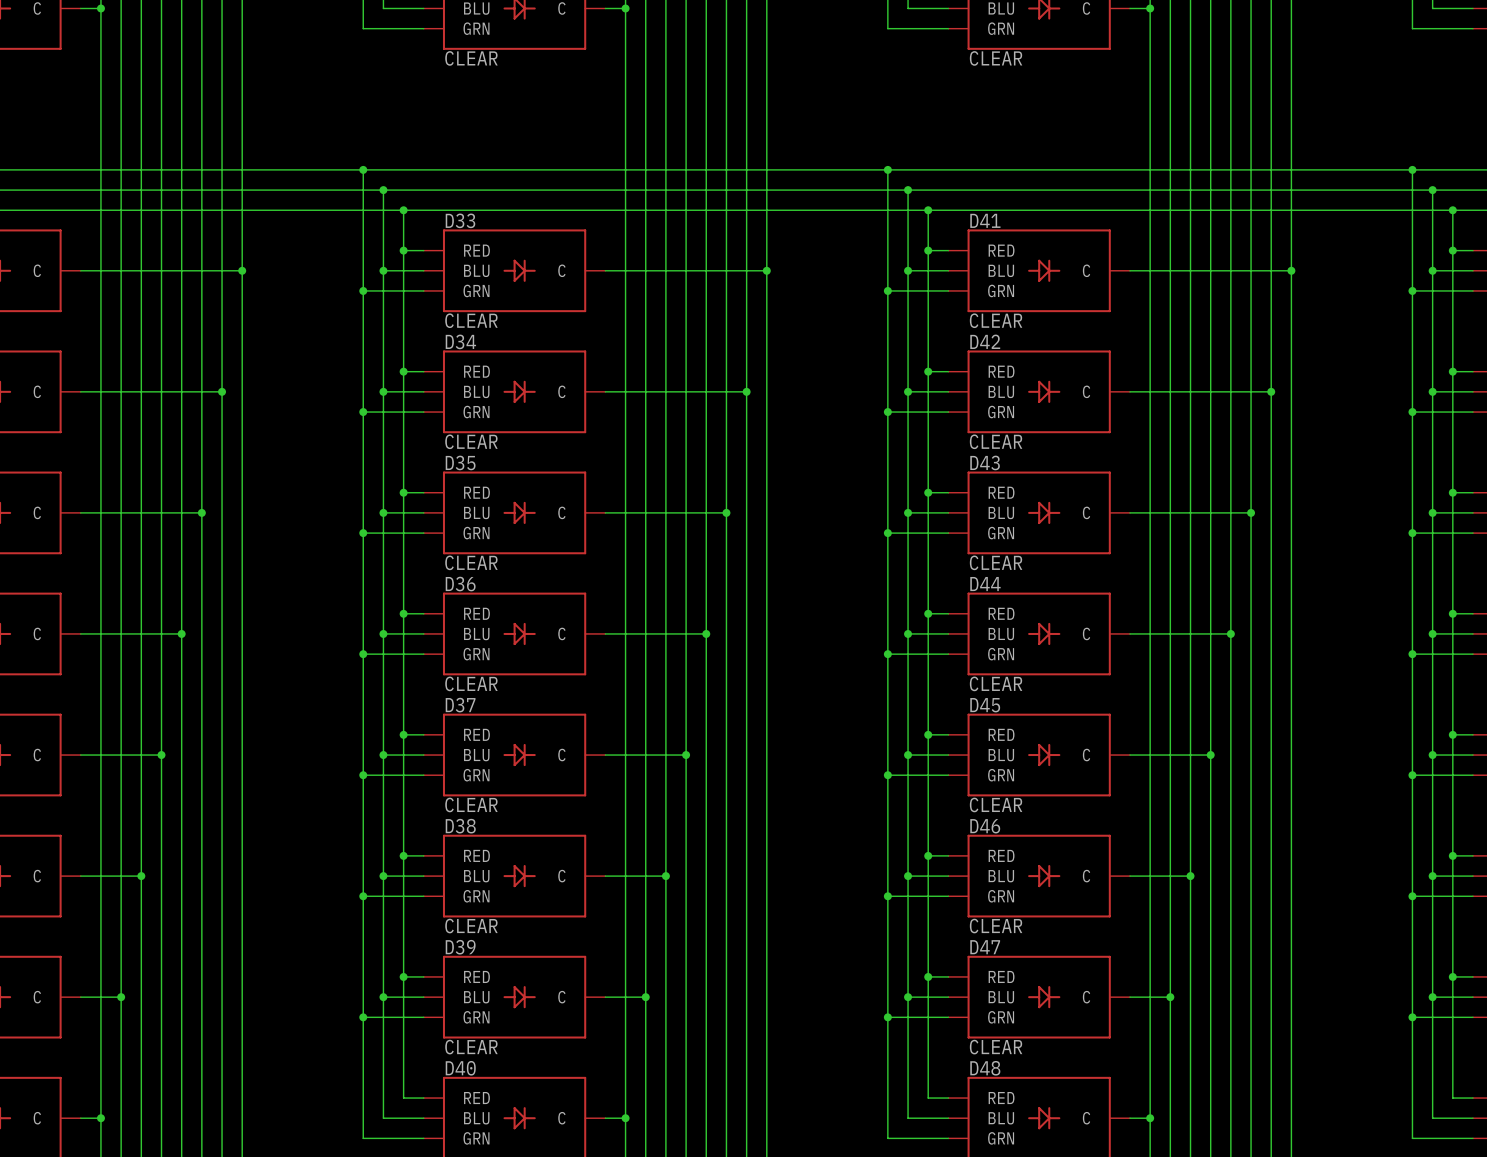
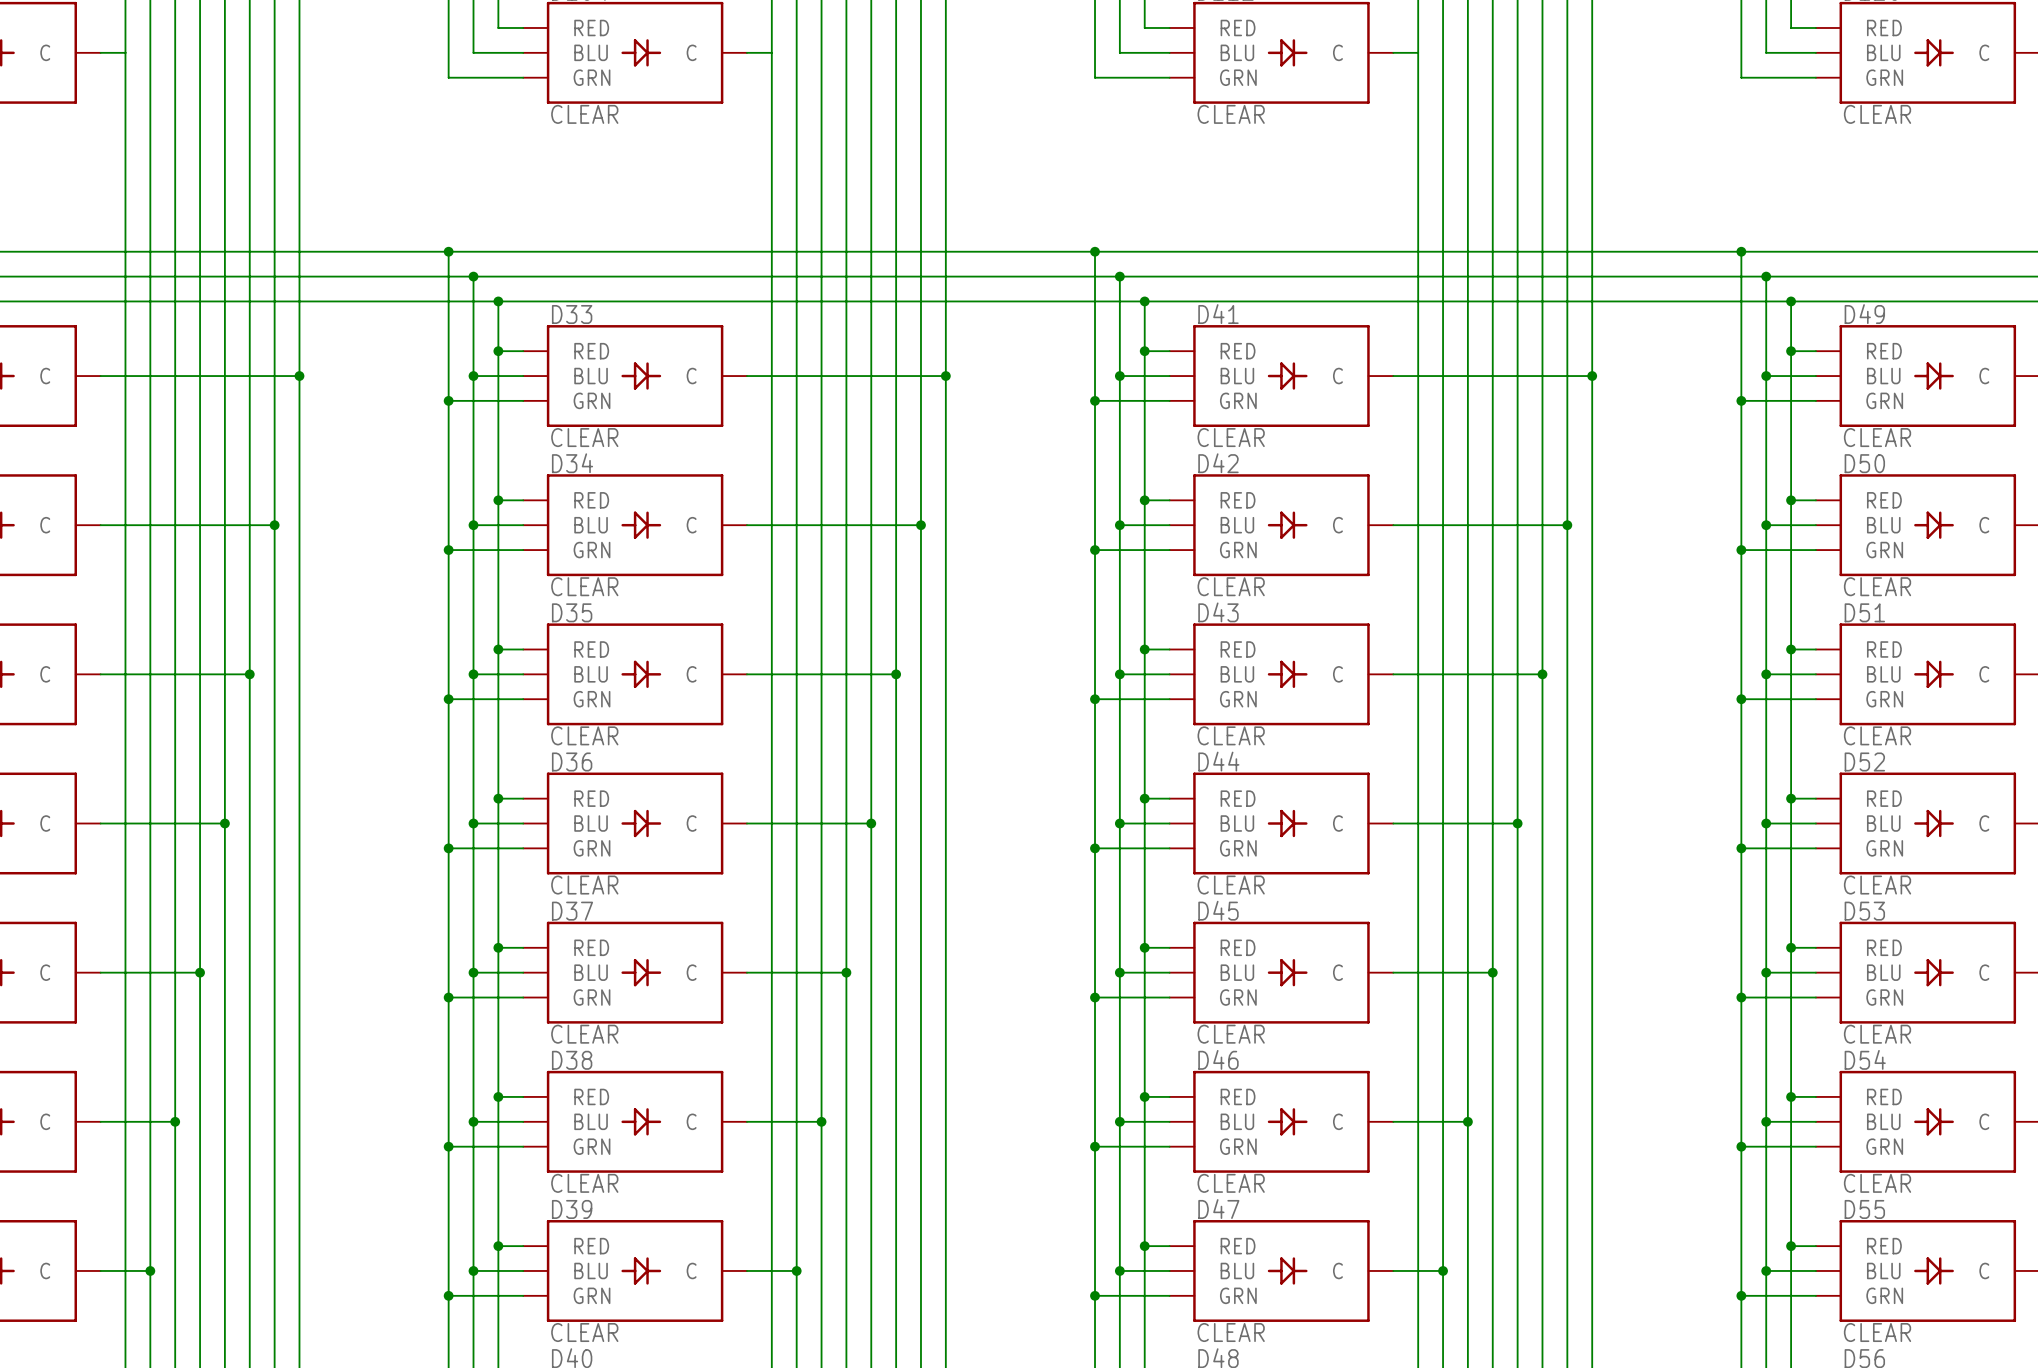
junction: (100, 8) -> none
junction: (625, 8) -> none
junction: (1150, 8) -> none

